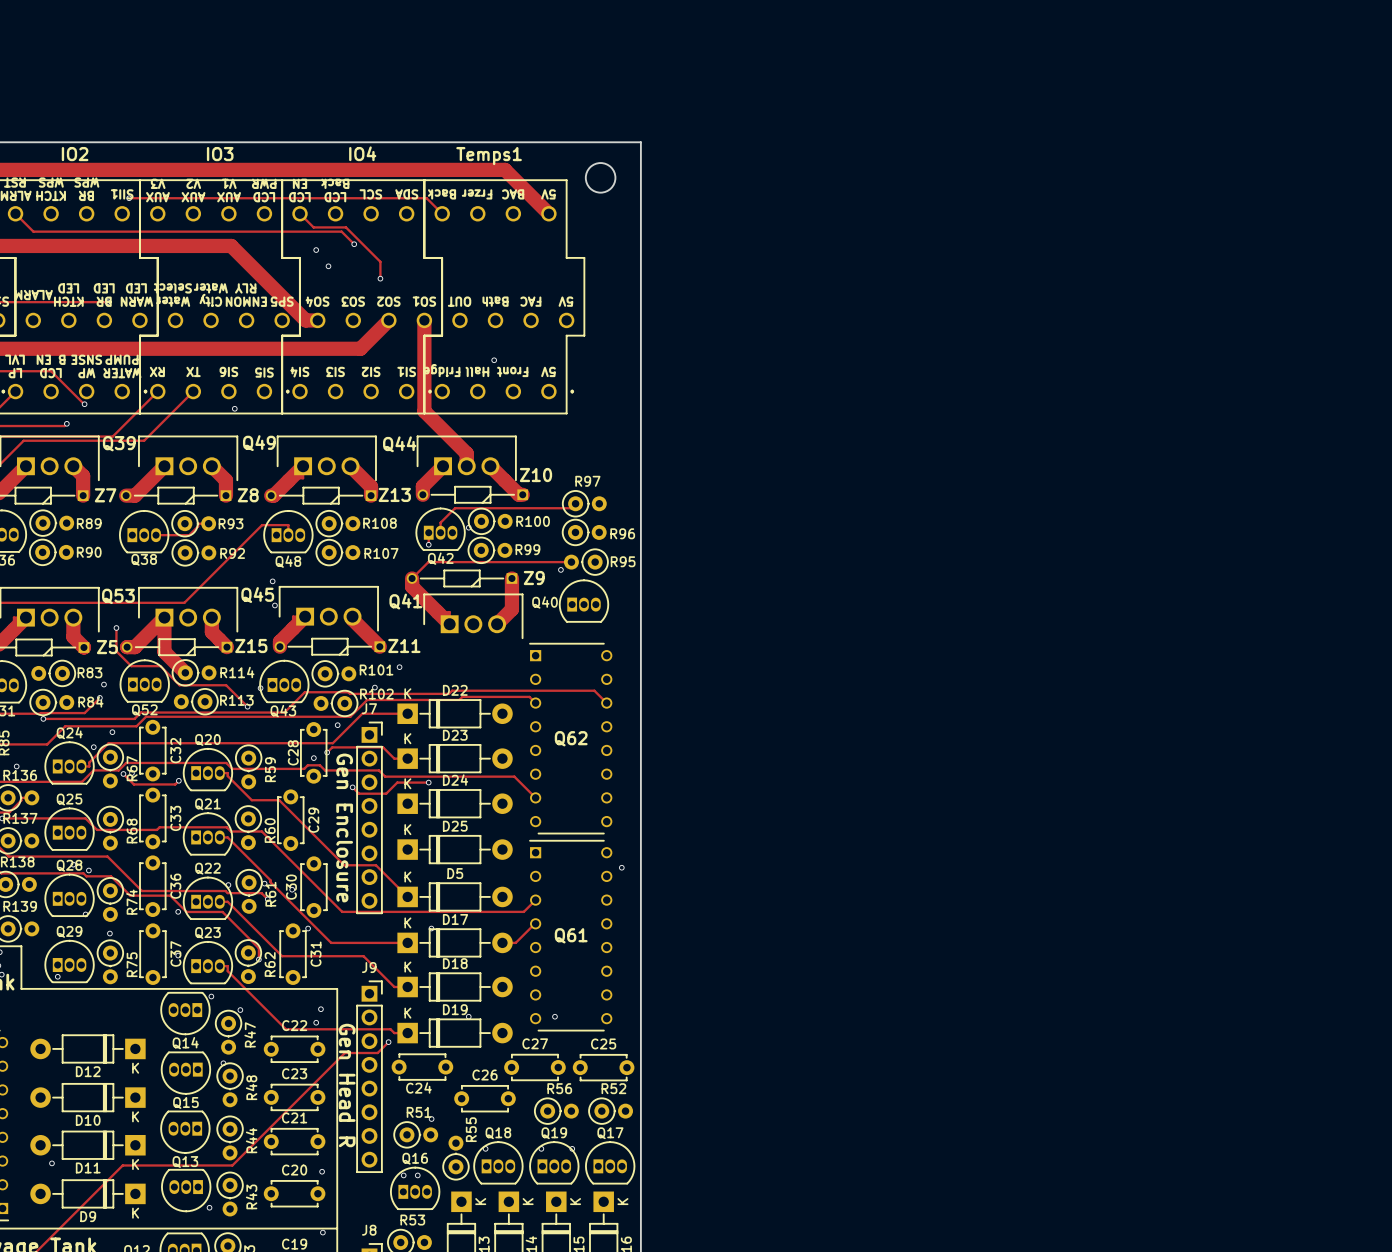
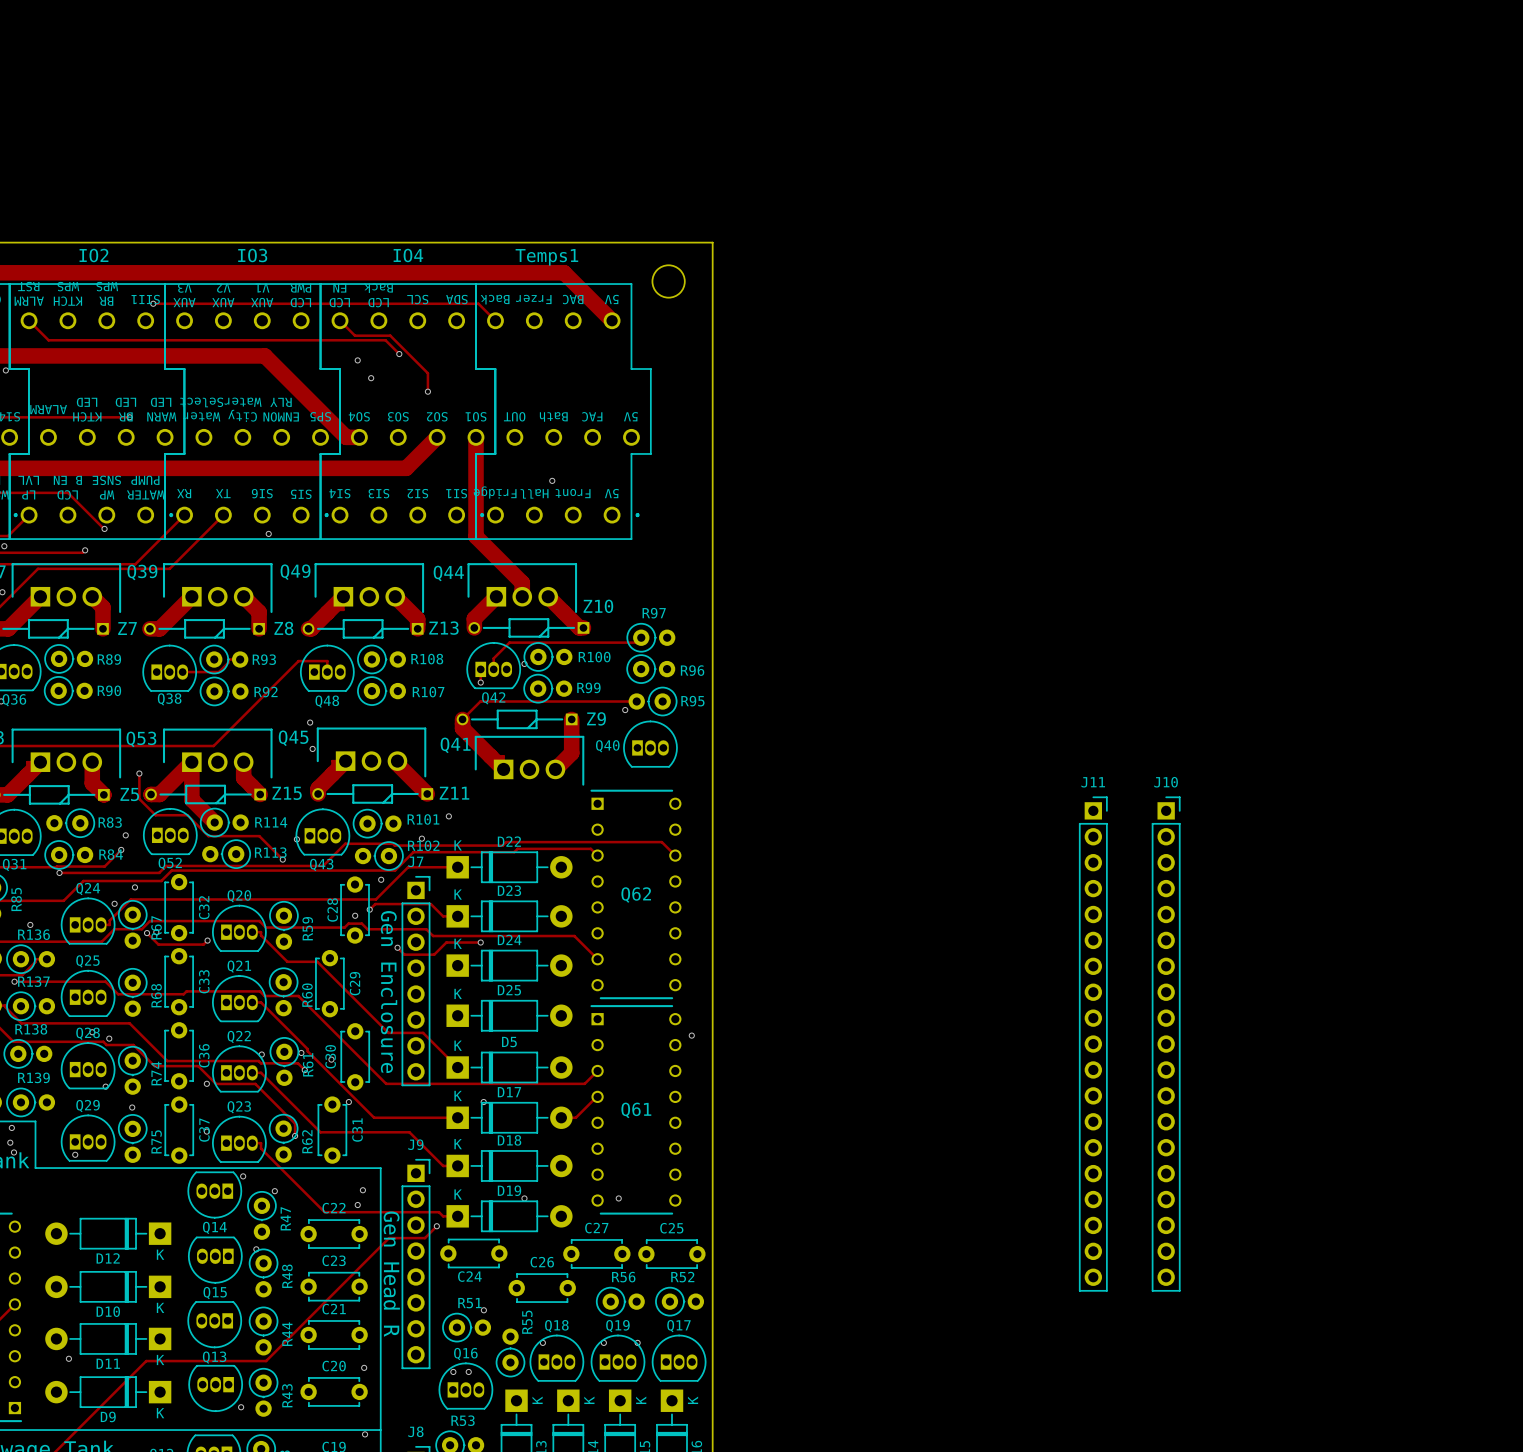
J11: none -> (1093, 1044)
J10: none -> (1166, 1044)

